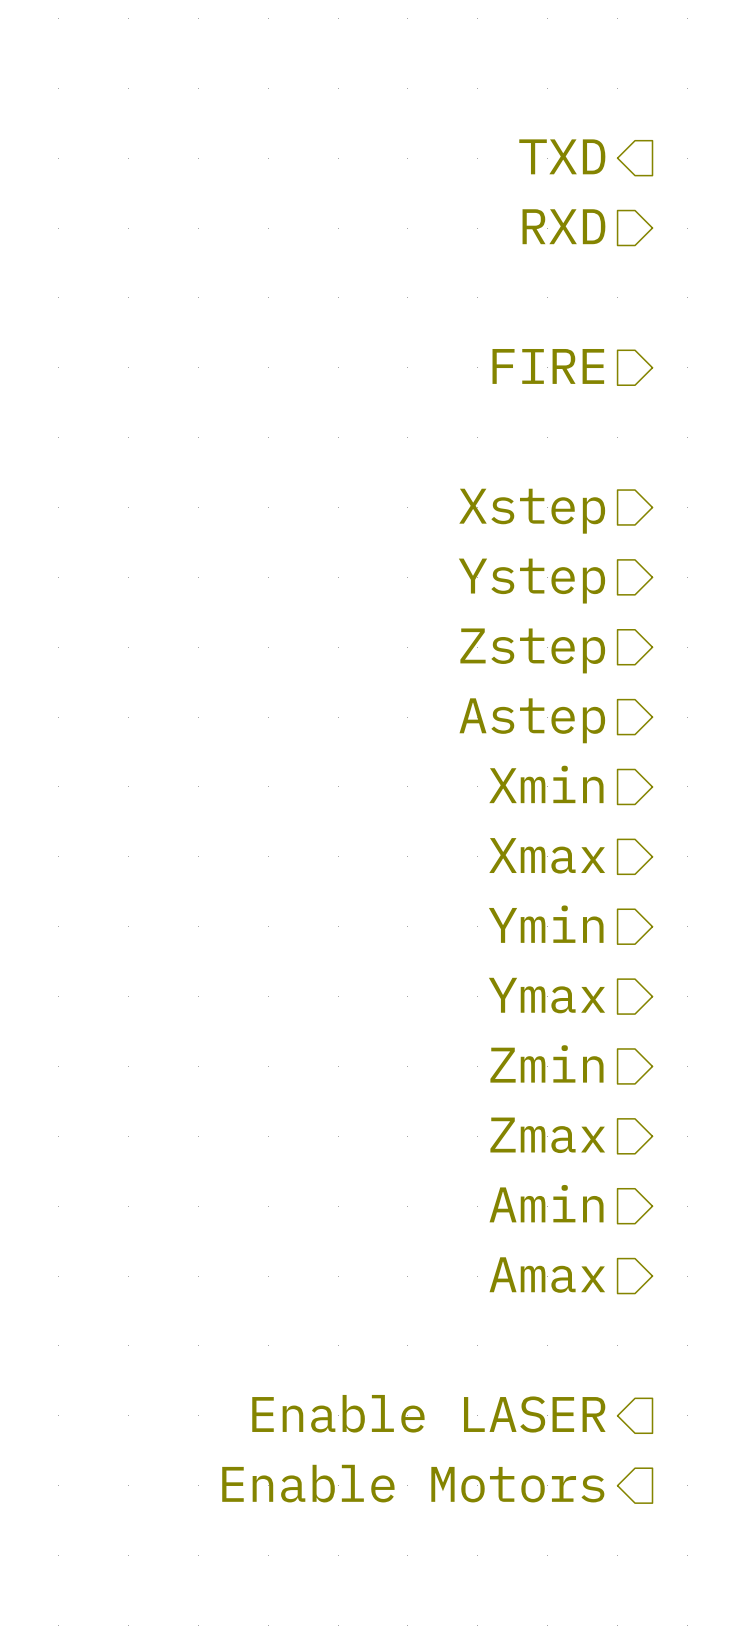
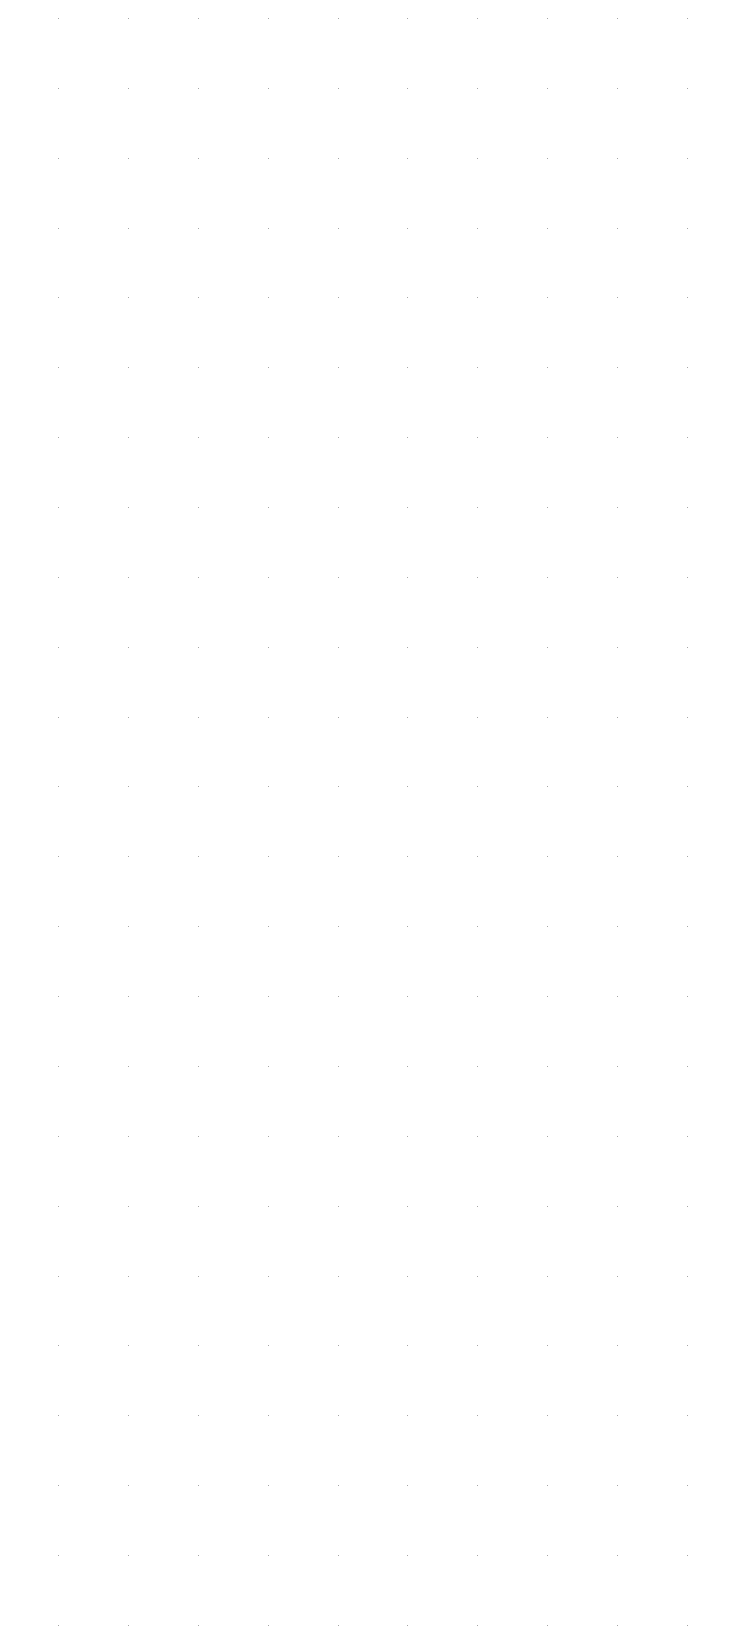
hierarchical label: TXD (562, 156) -> none
hierarchical label: RXD (563, 226) -> none
hierarchical label: FIRE (548, 366) -> none
hierarchical label: Xstep (532, 511) -> none
hierarchical label: Ystep (531, 581) -> none
hierarchical label: Zstep (532, 650) -> none
hierarchical label: Astep (532, 720) -> none
hierarchical label: Xmin (546, 784) -> none
hierarchical label: Xmax (547, 855) -> none
hierarchical label: Ymin (546, 924) -> none
hierarchical label: Ymax (546, 995) -> none
hierarchical label: Zmin (546, 1063) -> none
hierarchical label: Zmax (547, 1135) -> none
hierarchical label: Amin (546, 1203) -> none
hierarchical label: Amax (547, 1275) -> none
hierarchical label: Enable LASER (428, 1413) -> none
hierarchical label: Enable Motors (413, 1483) -> none

